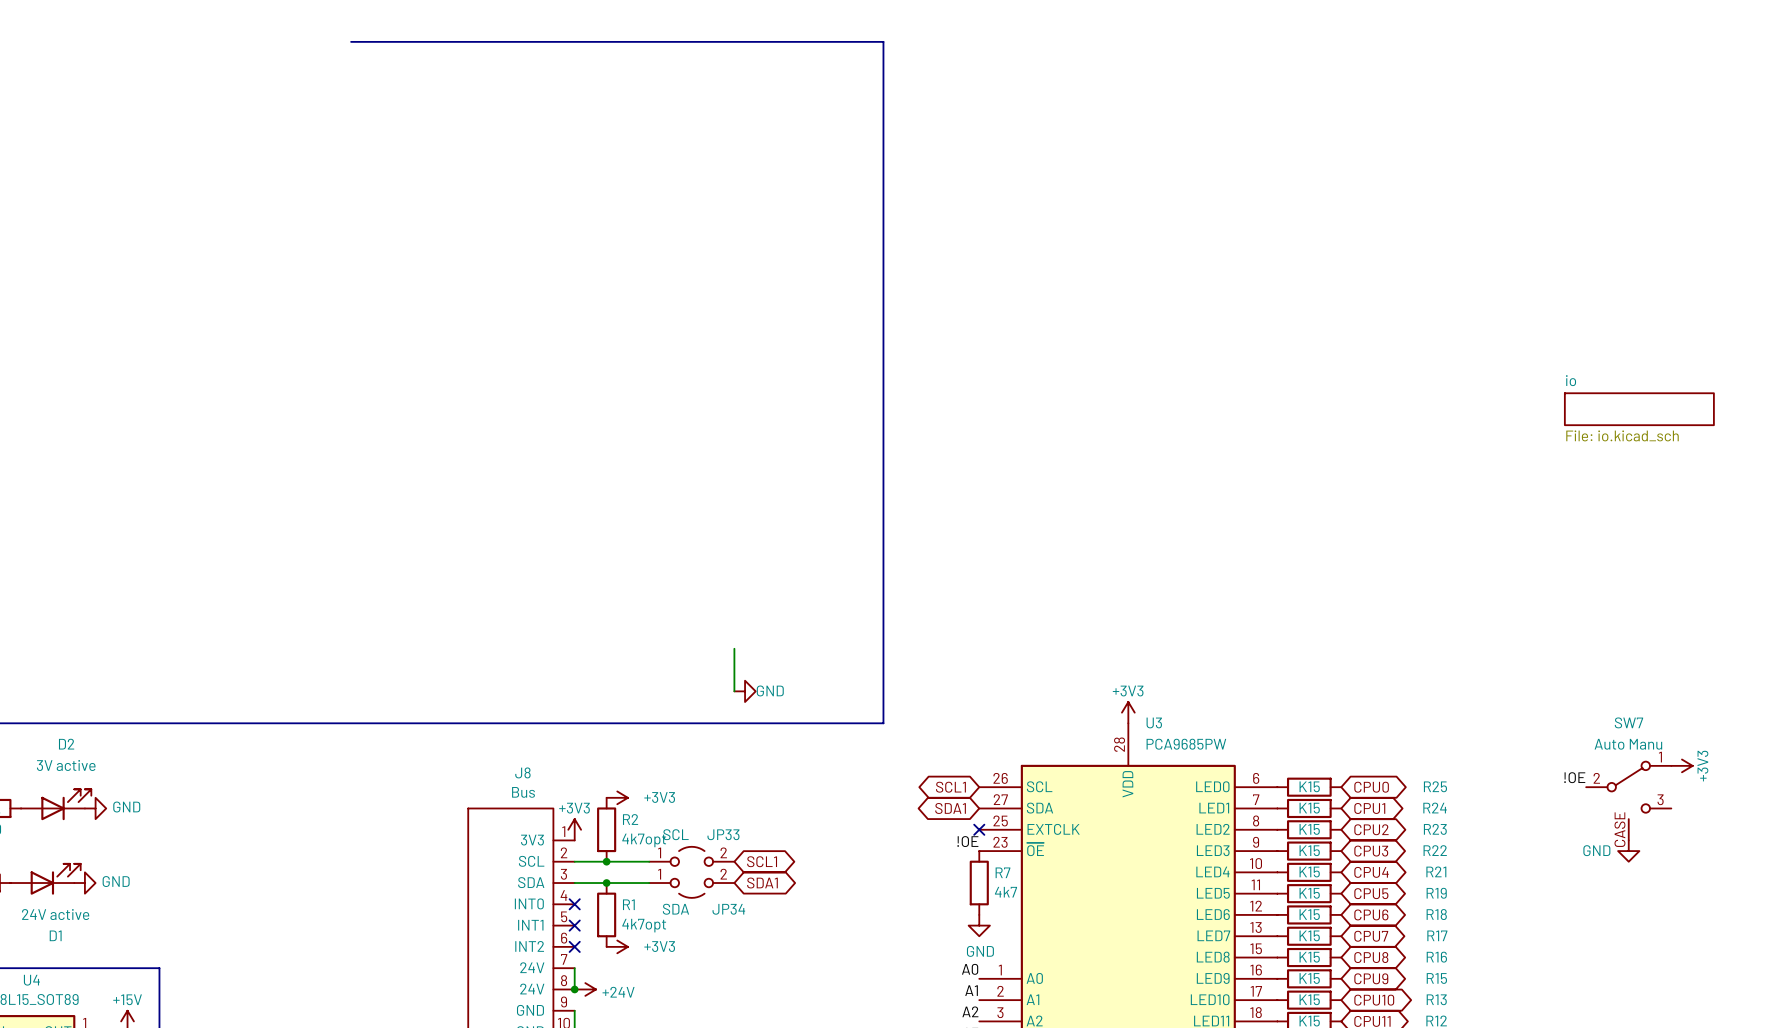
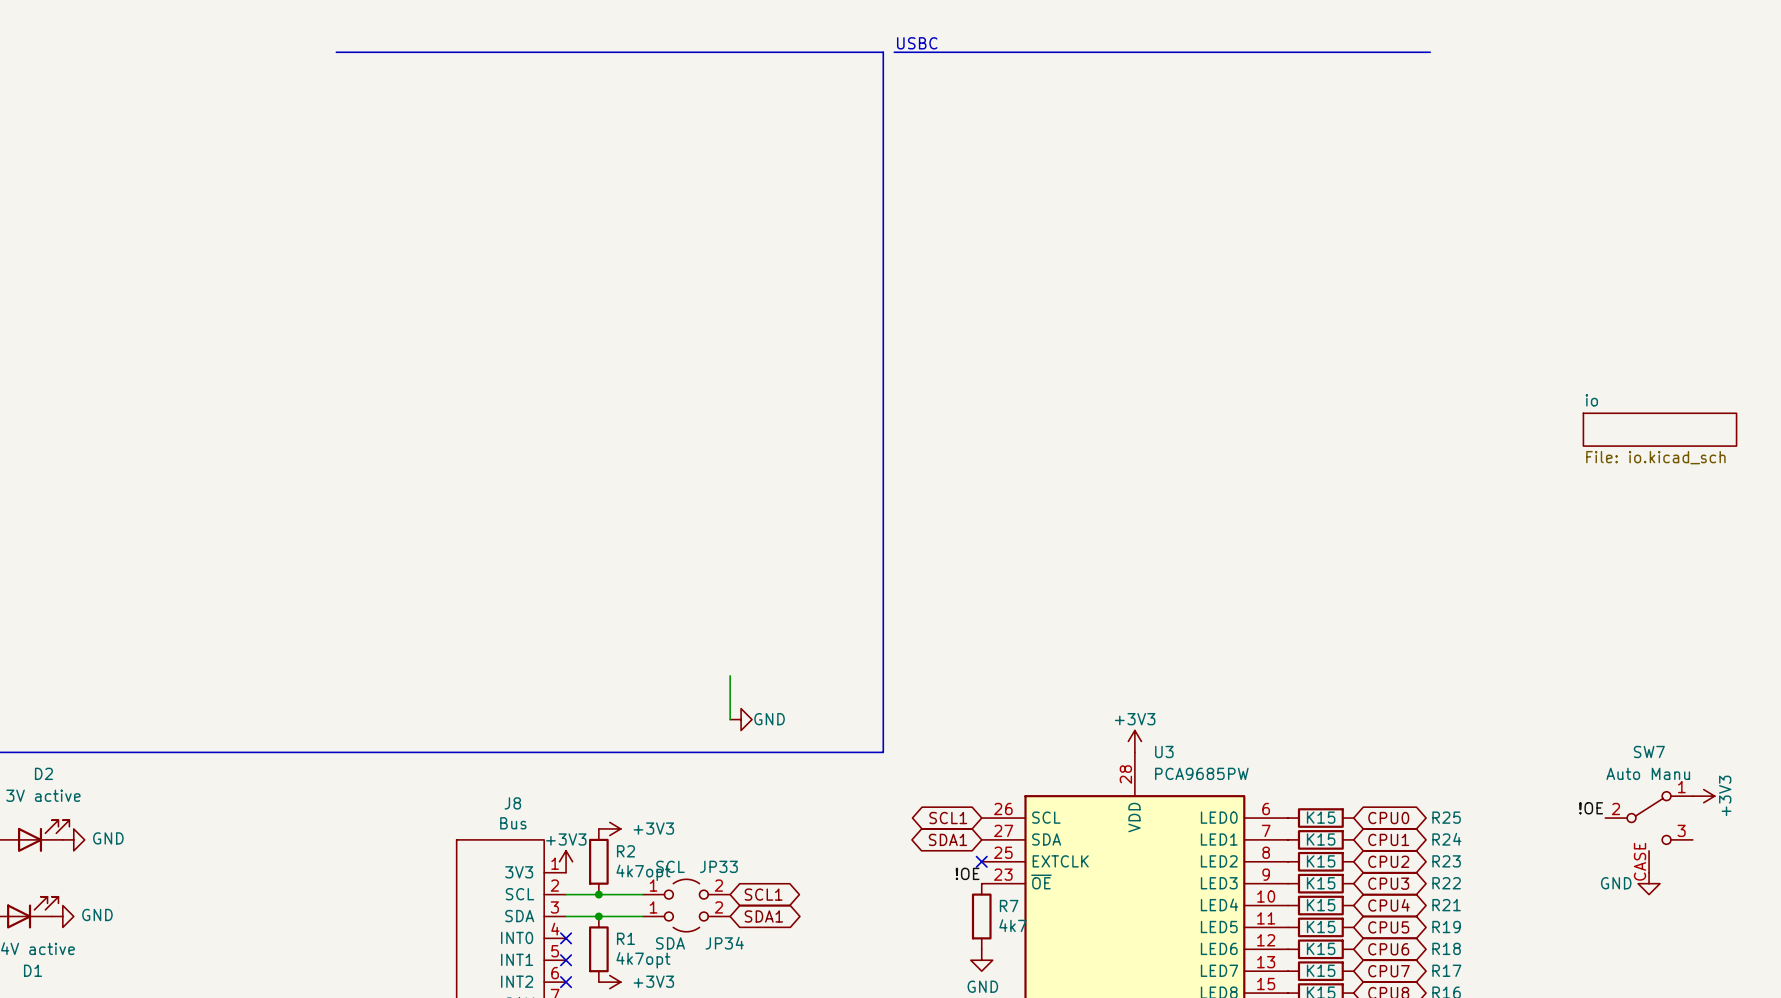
text: none -> USBC (917, 43)
line: none -> (894, 52) (1430, 52)

